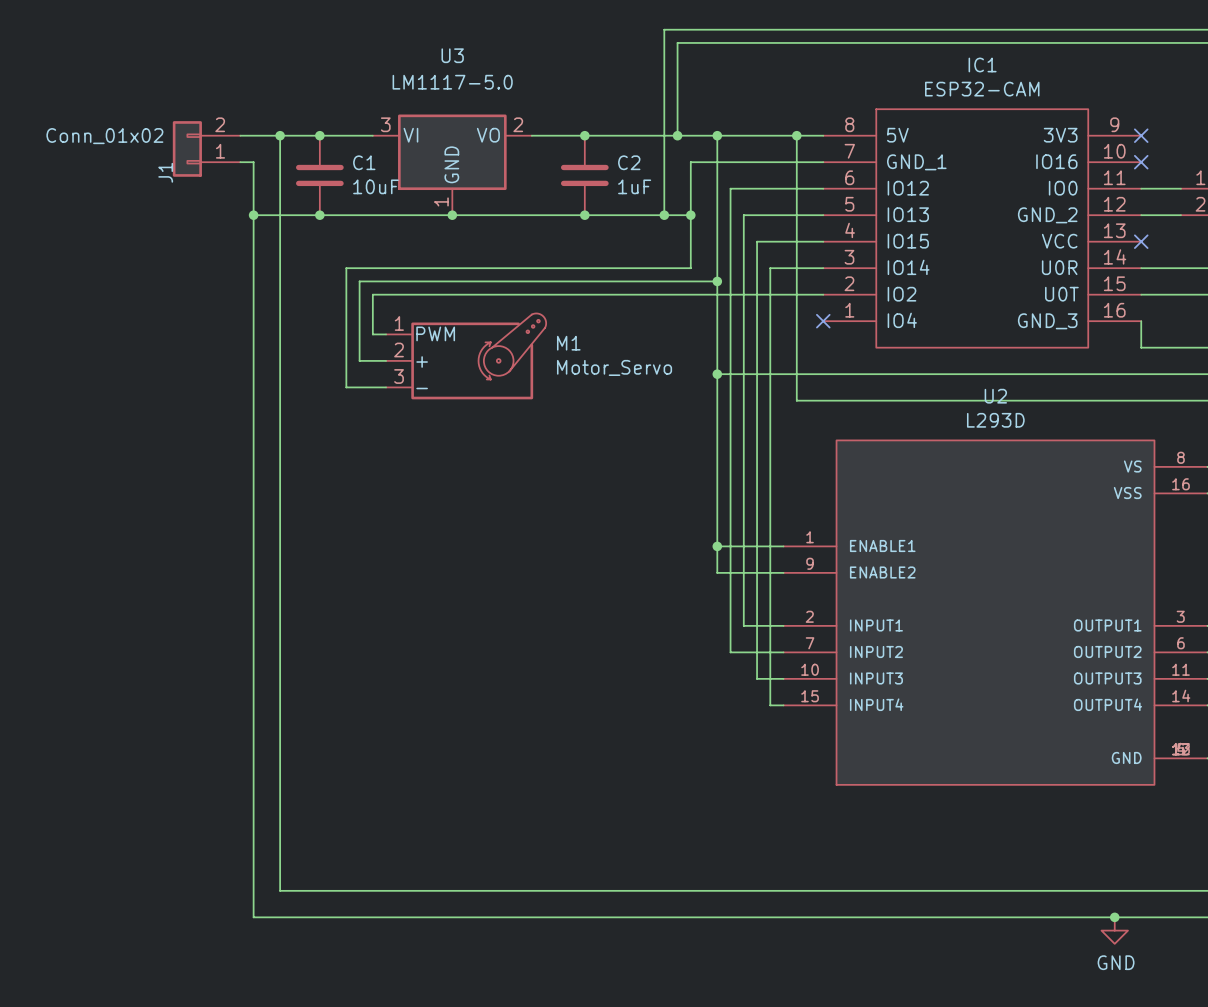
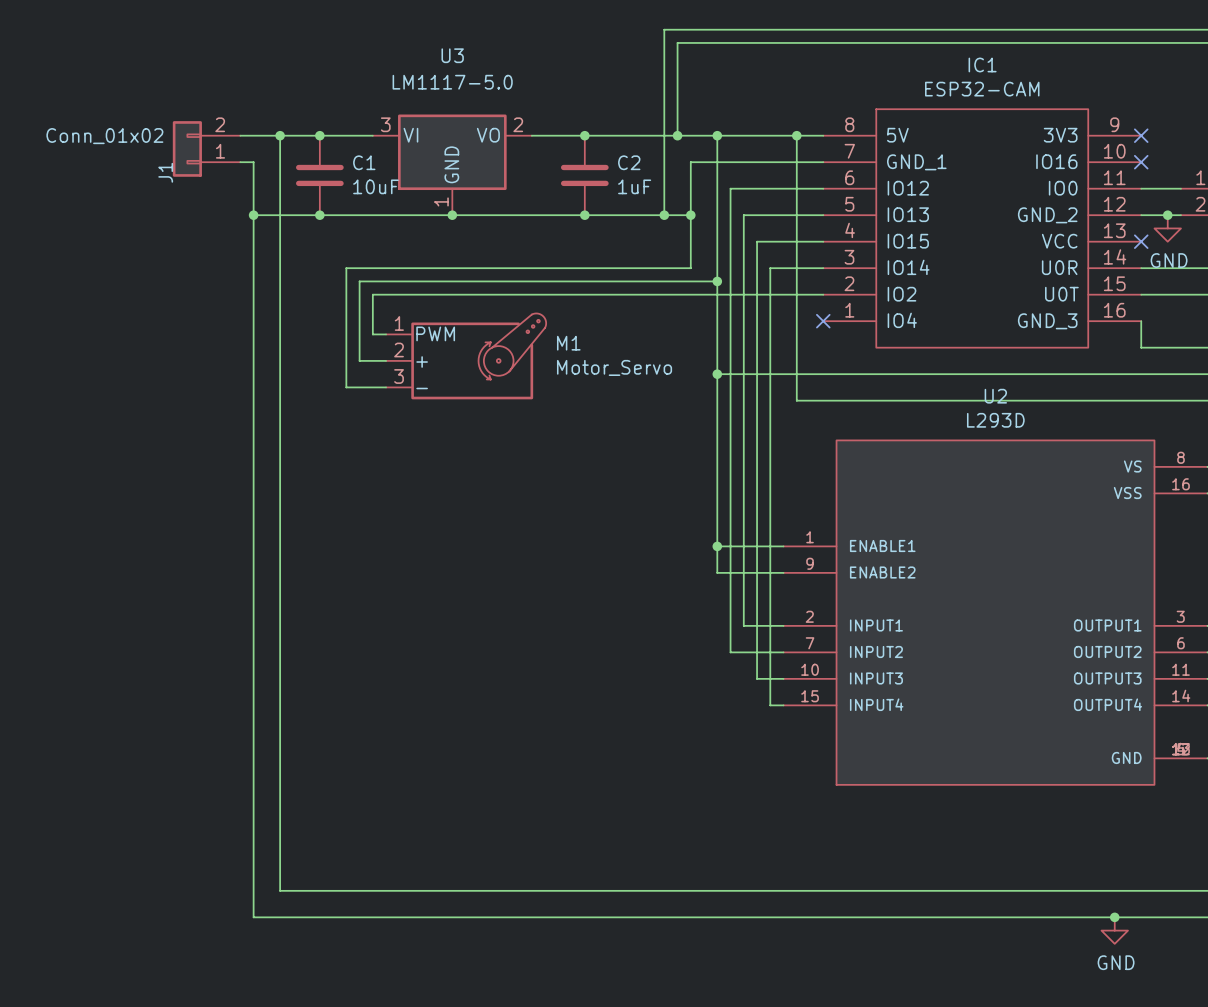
junction: none -> (1167, 215)
power symbol: none -> GND (1167, 228)

